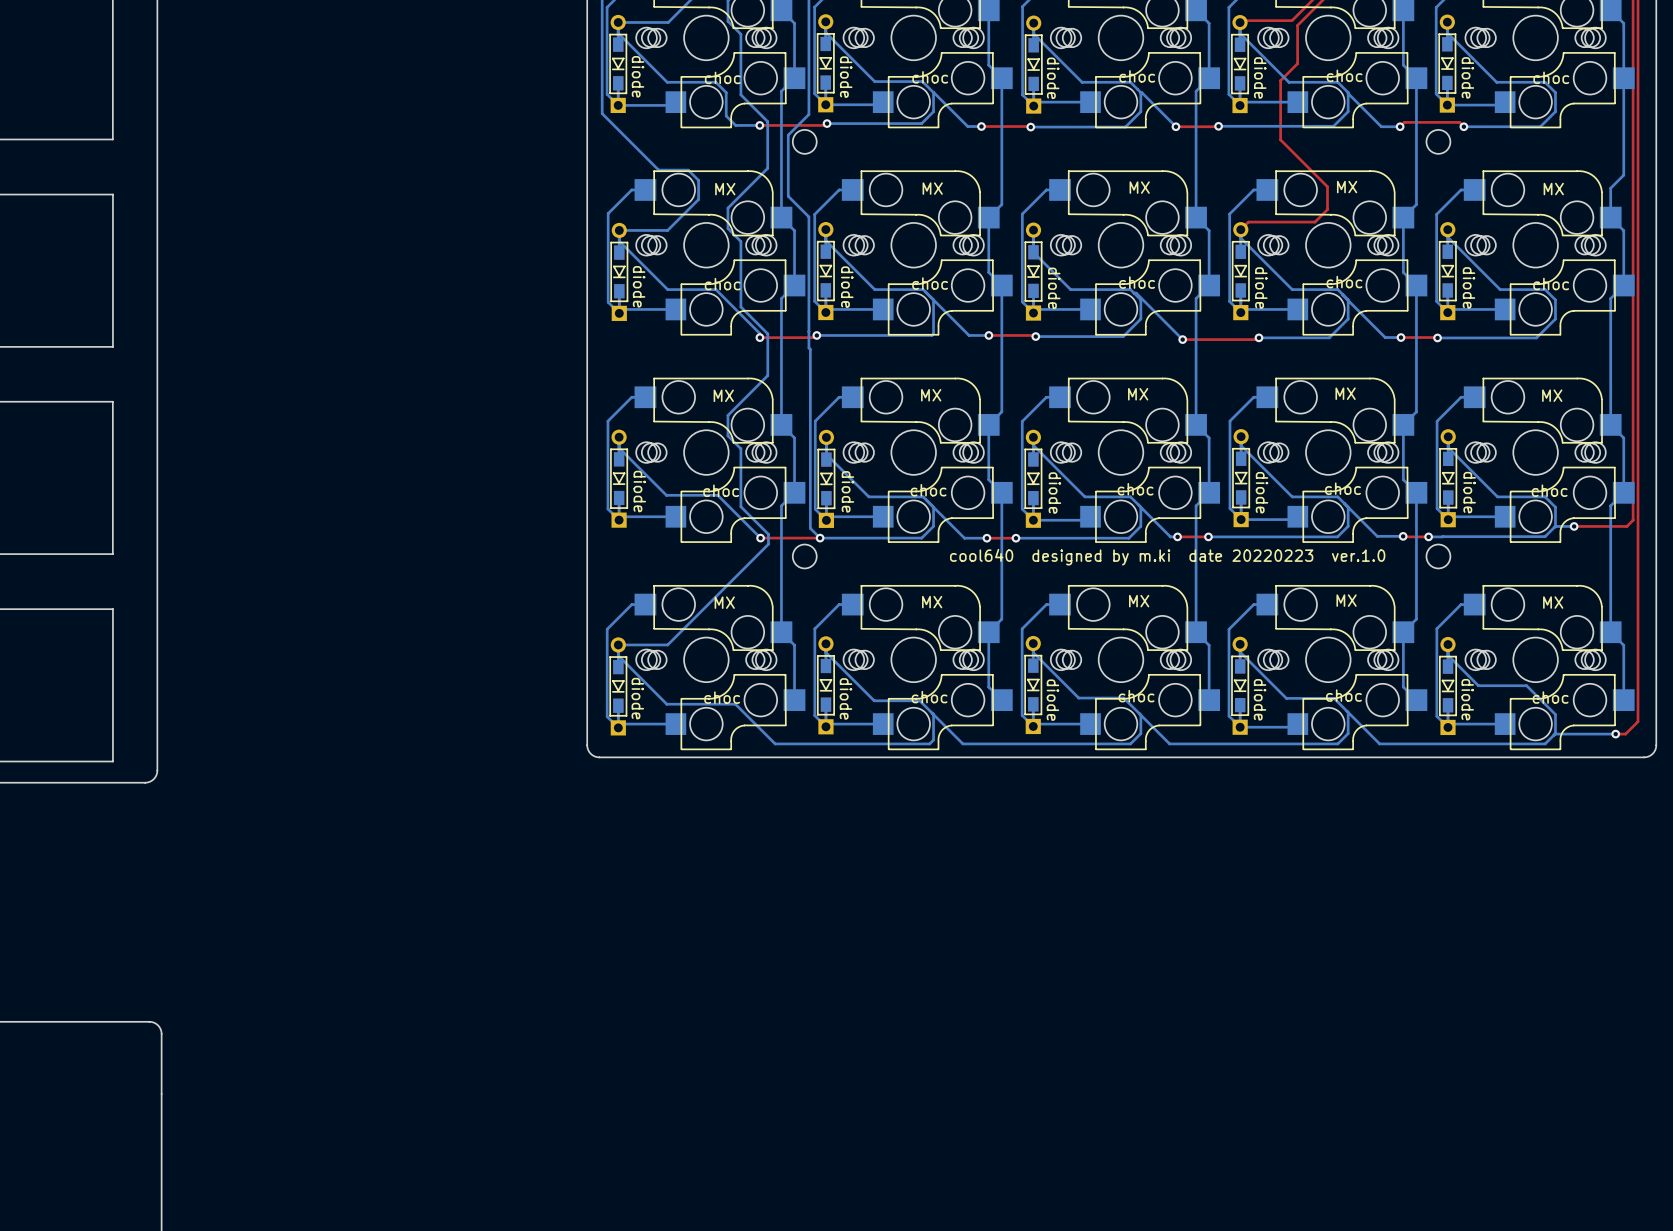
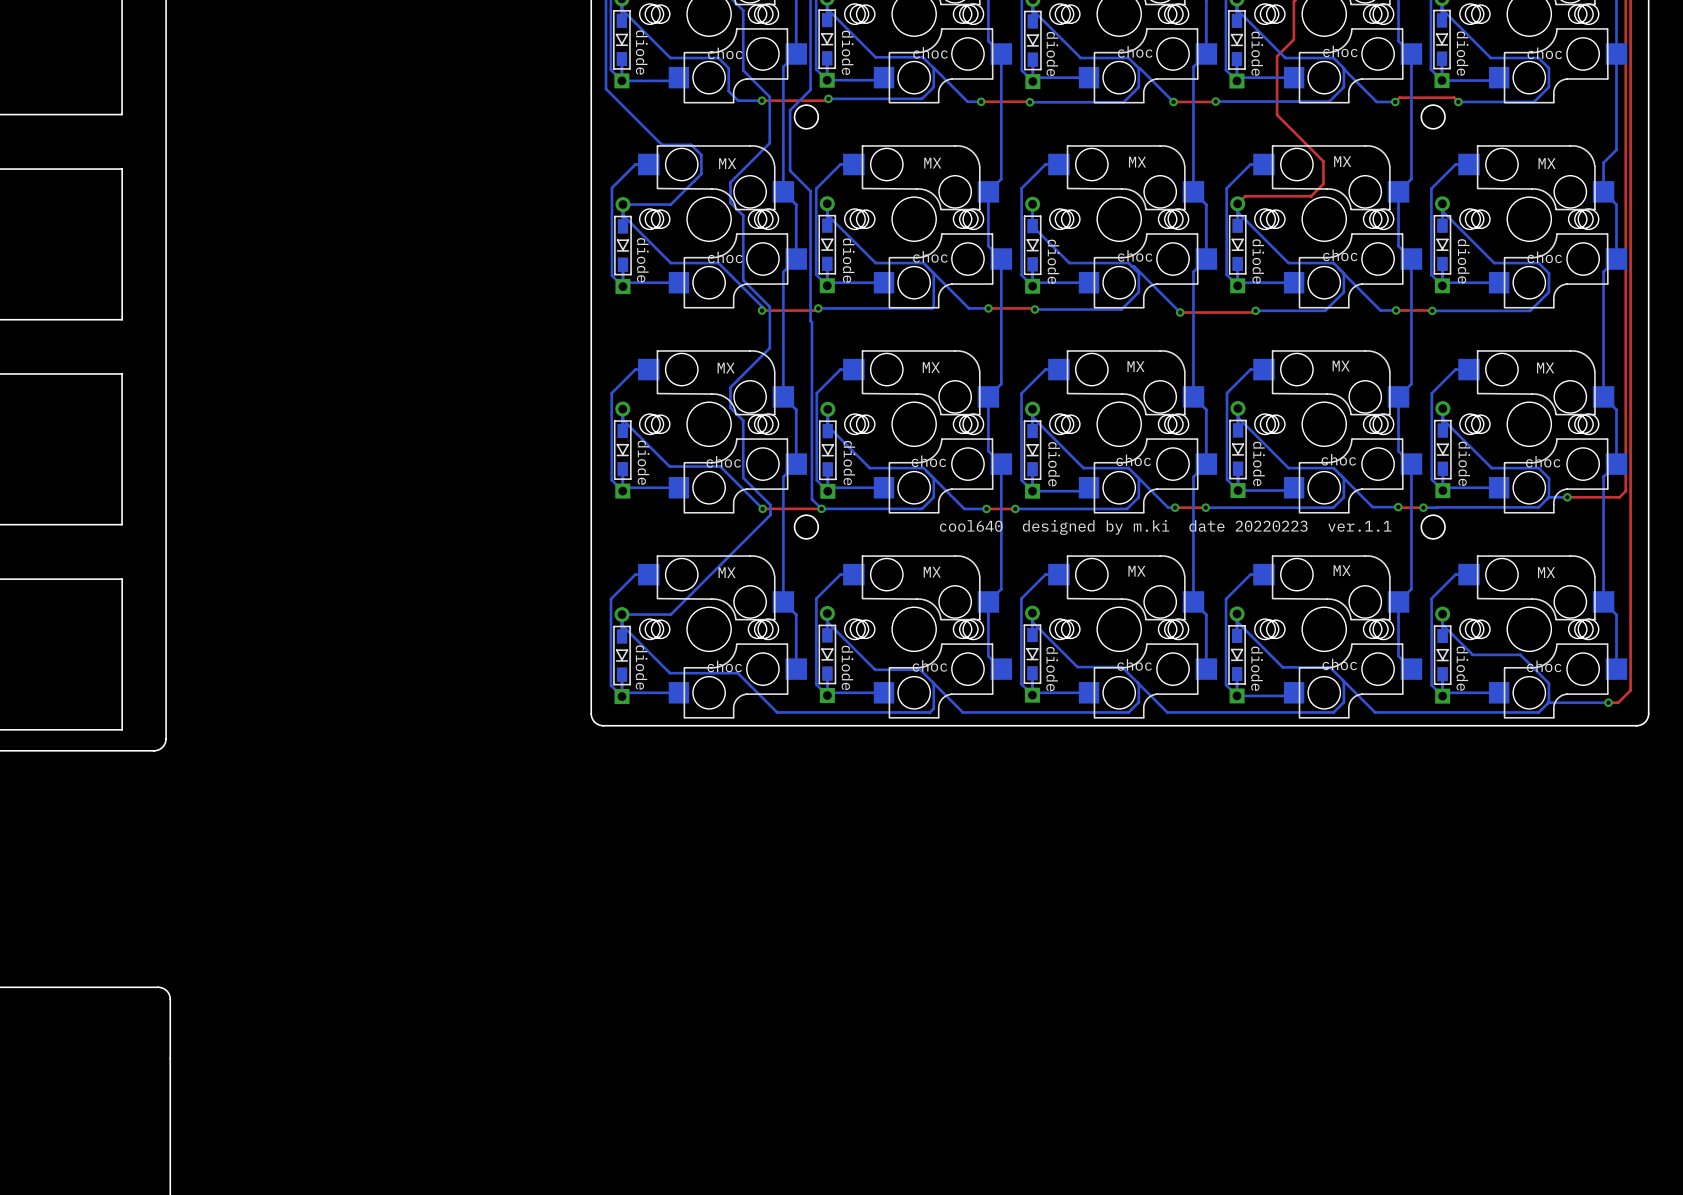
text: cool640 designed by m.ki date 20220223 ver.1.0 (1167, 557) -> cool640 designed by m.ki date 20220223 ver.1.1 (1165, 527)

